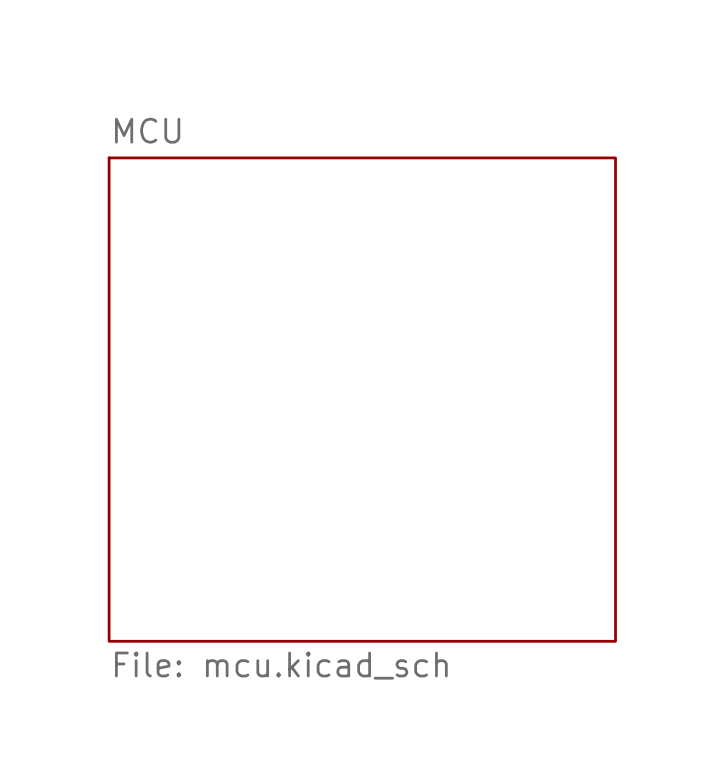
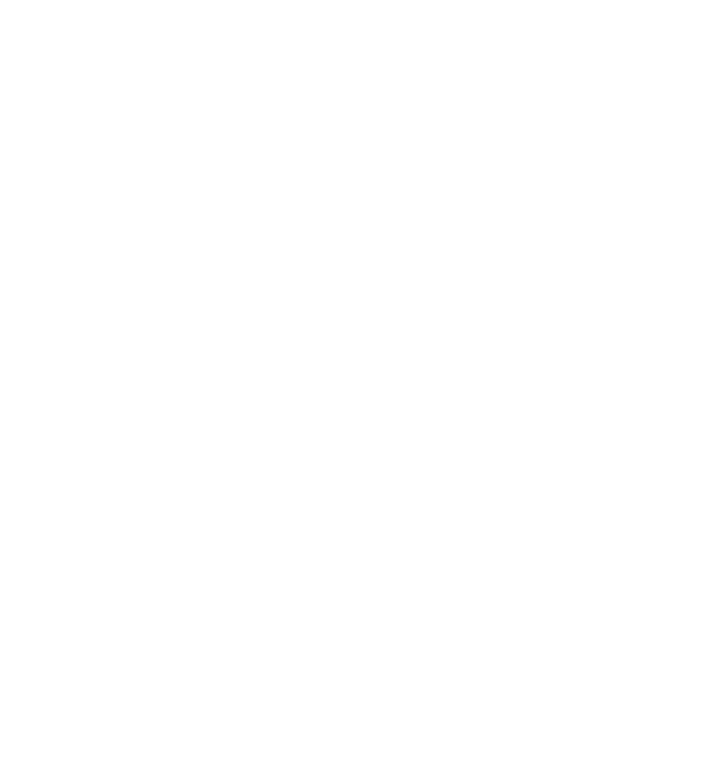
sheet MCU: File: mcu.kicad_sch (362, 399) -> none

